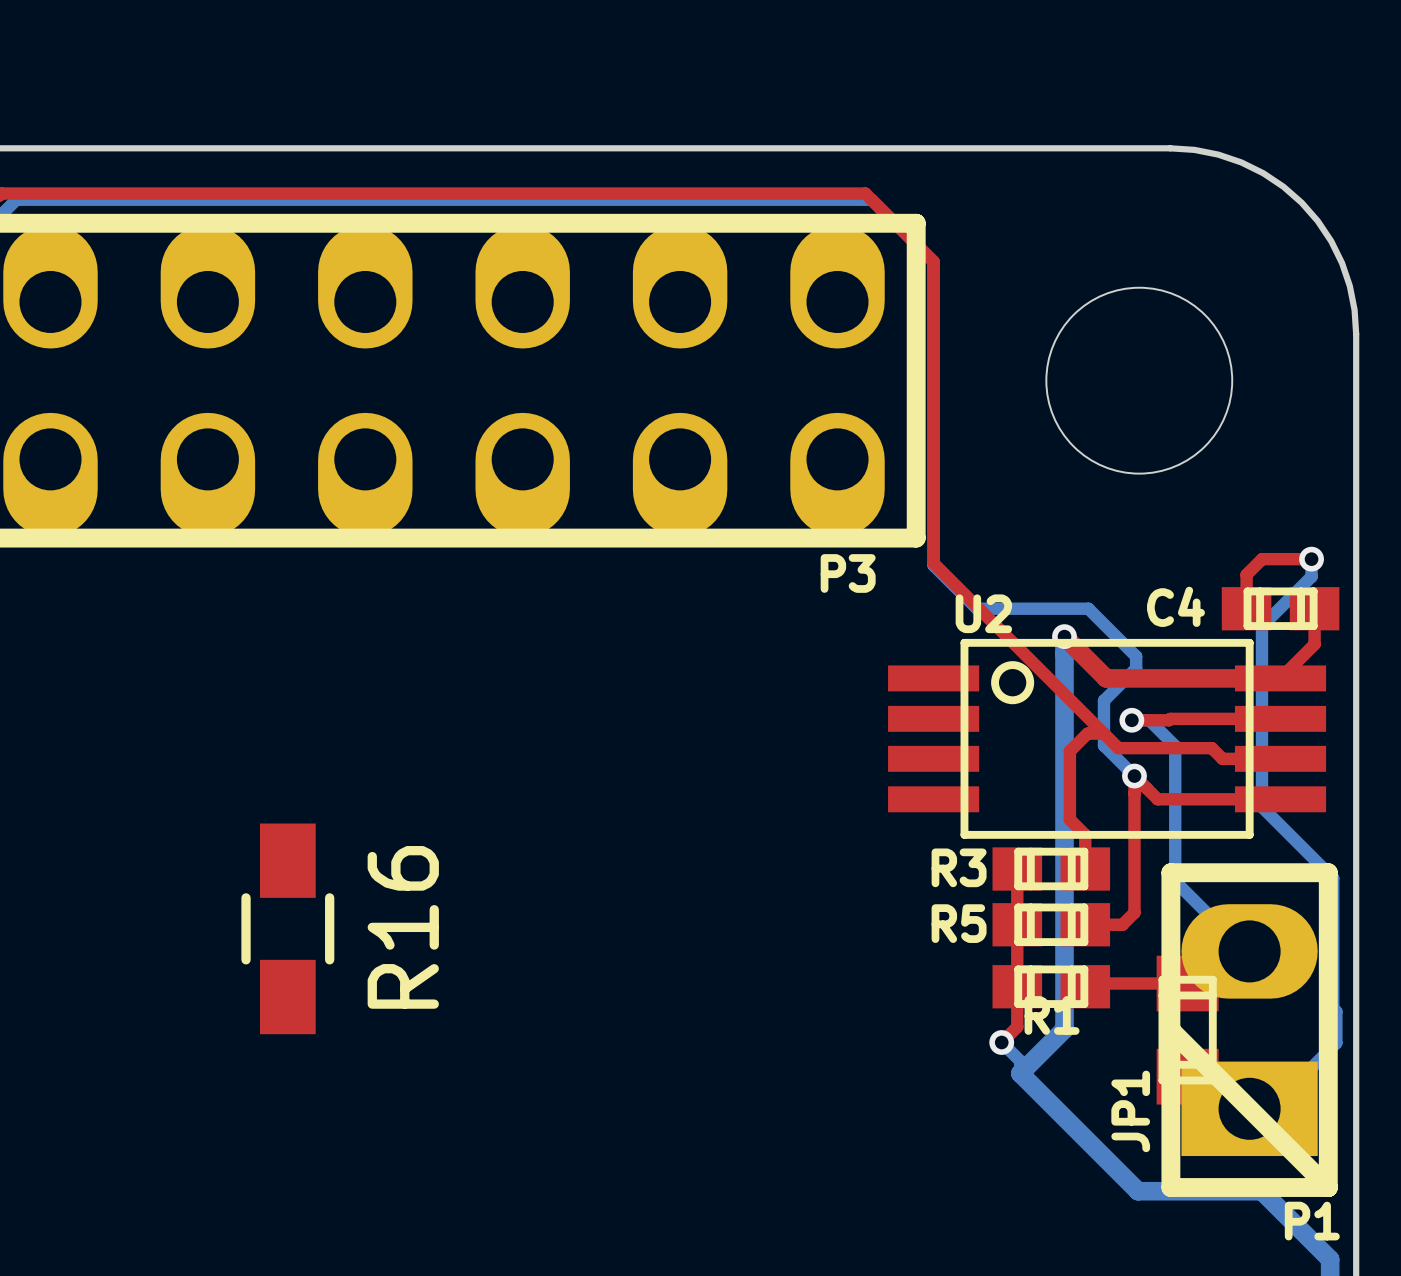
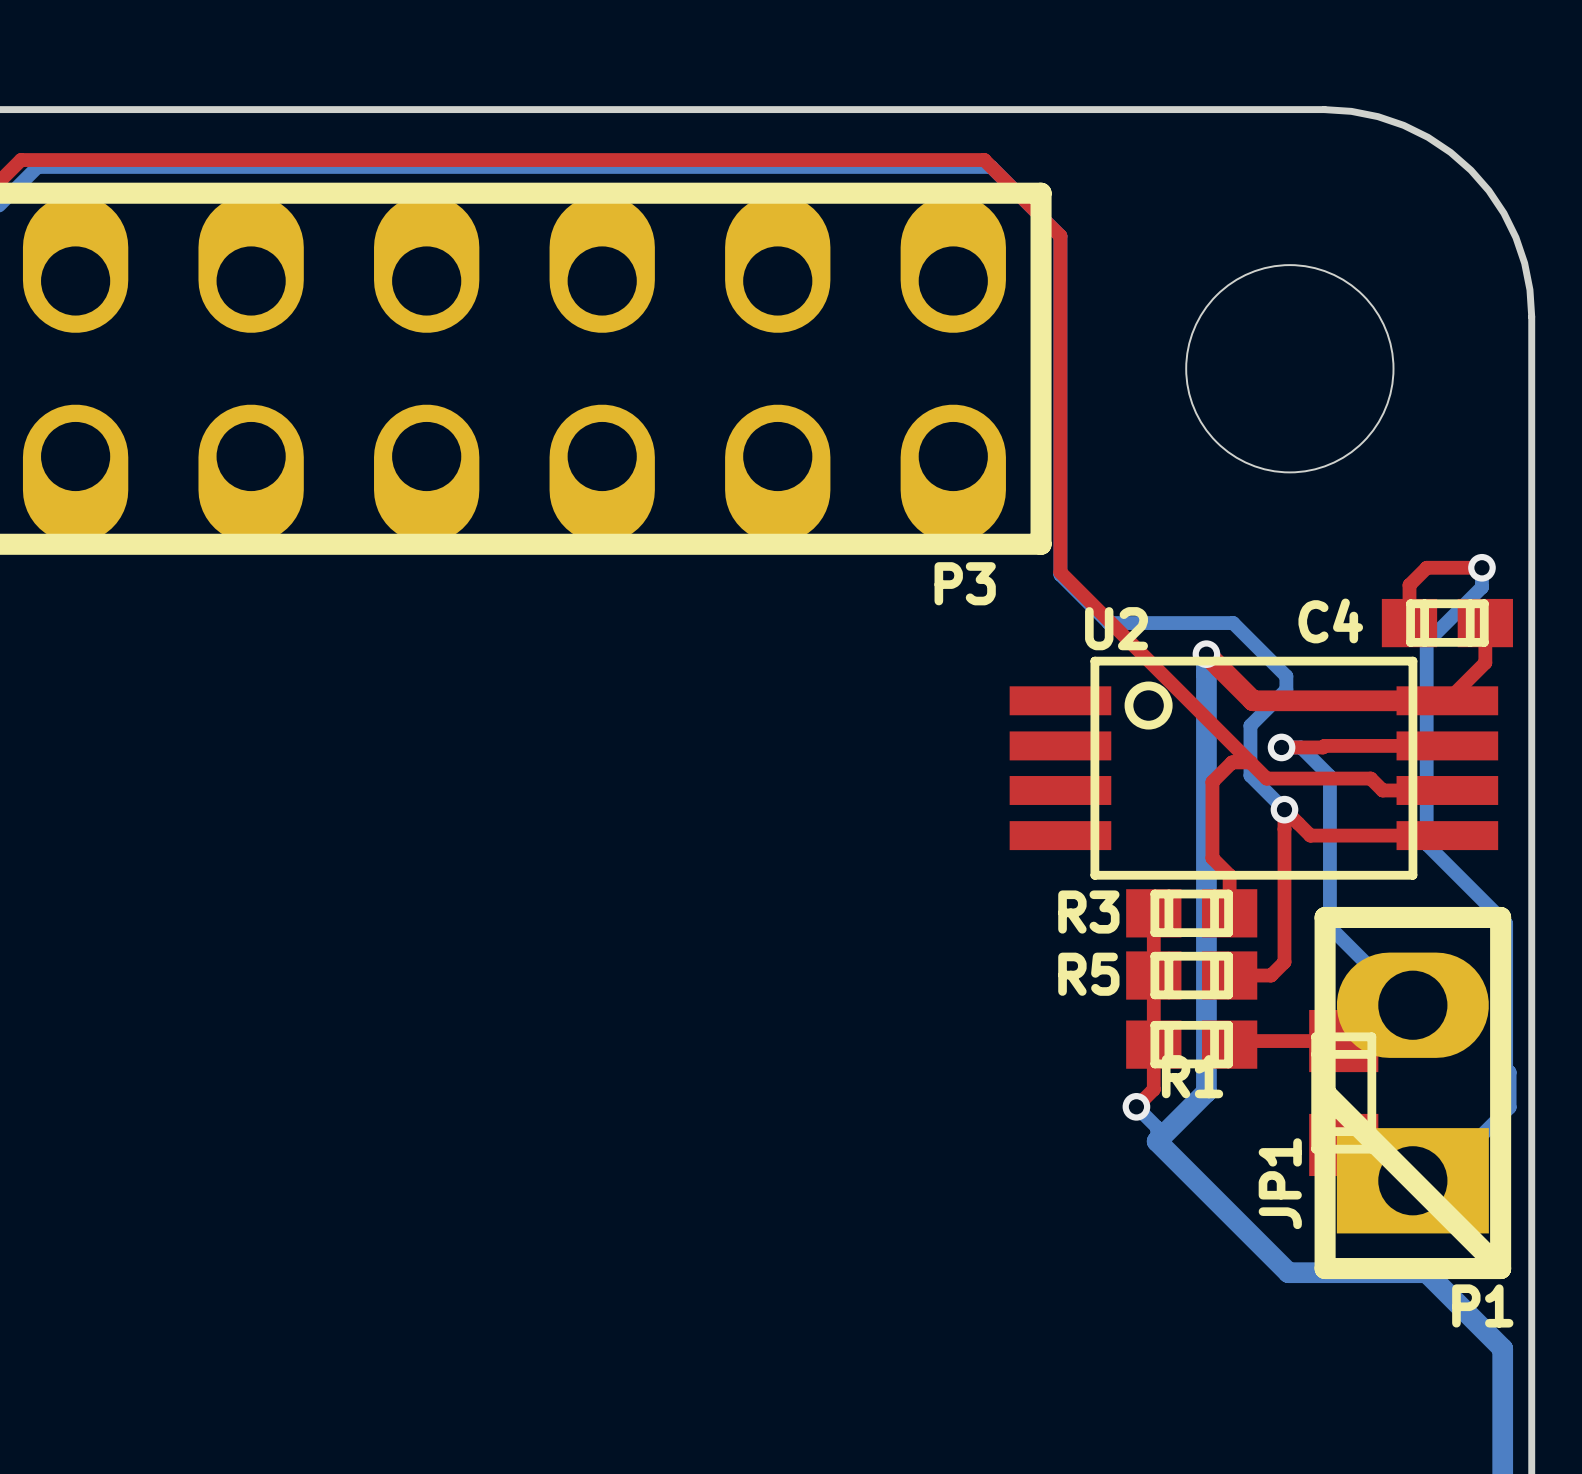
R16: (287, 928) -> none

